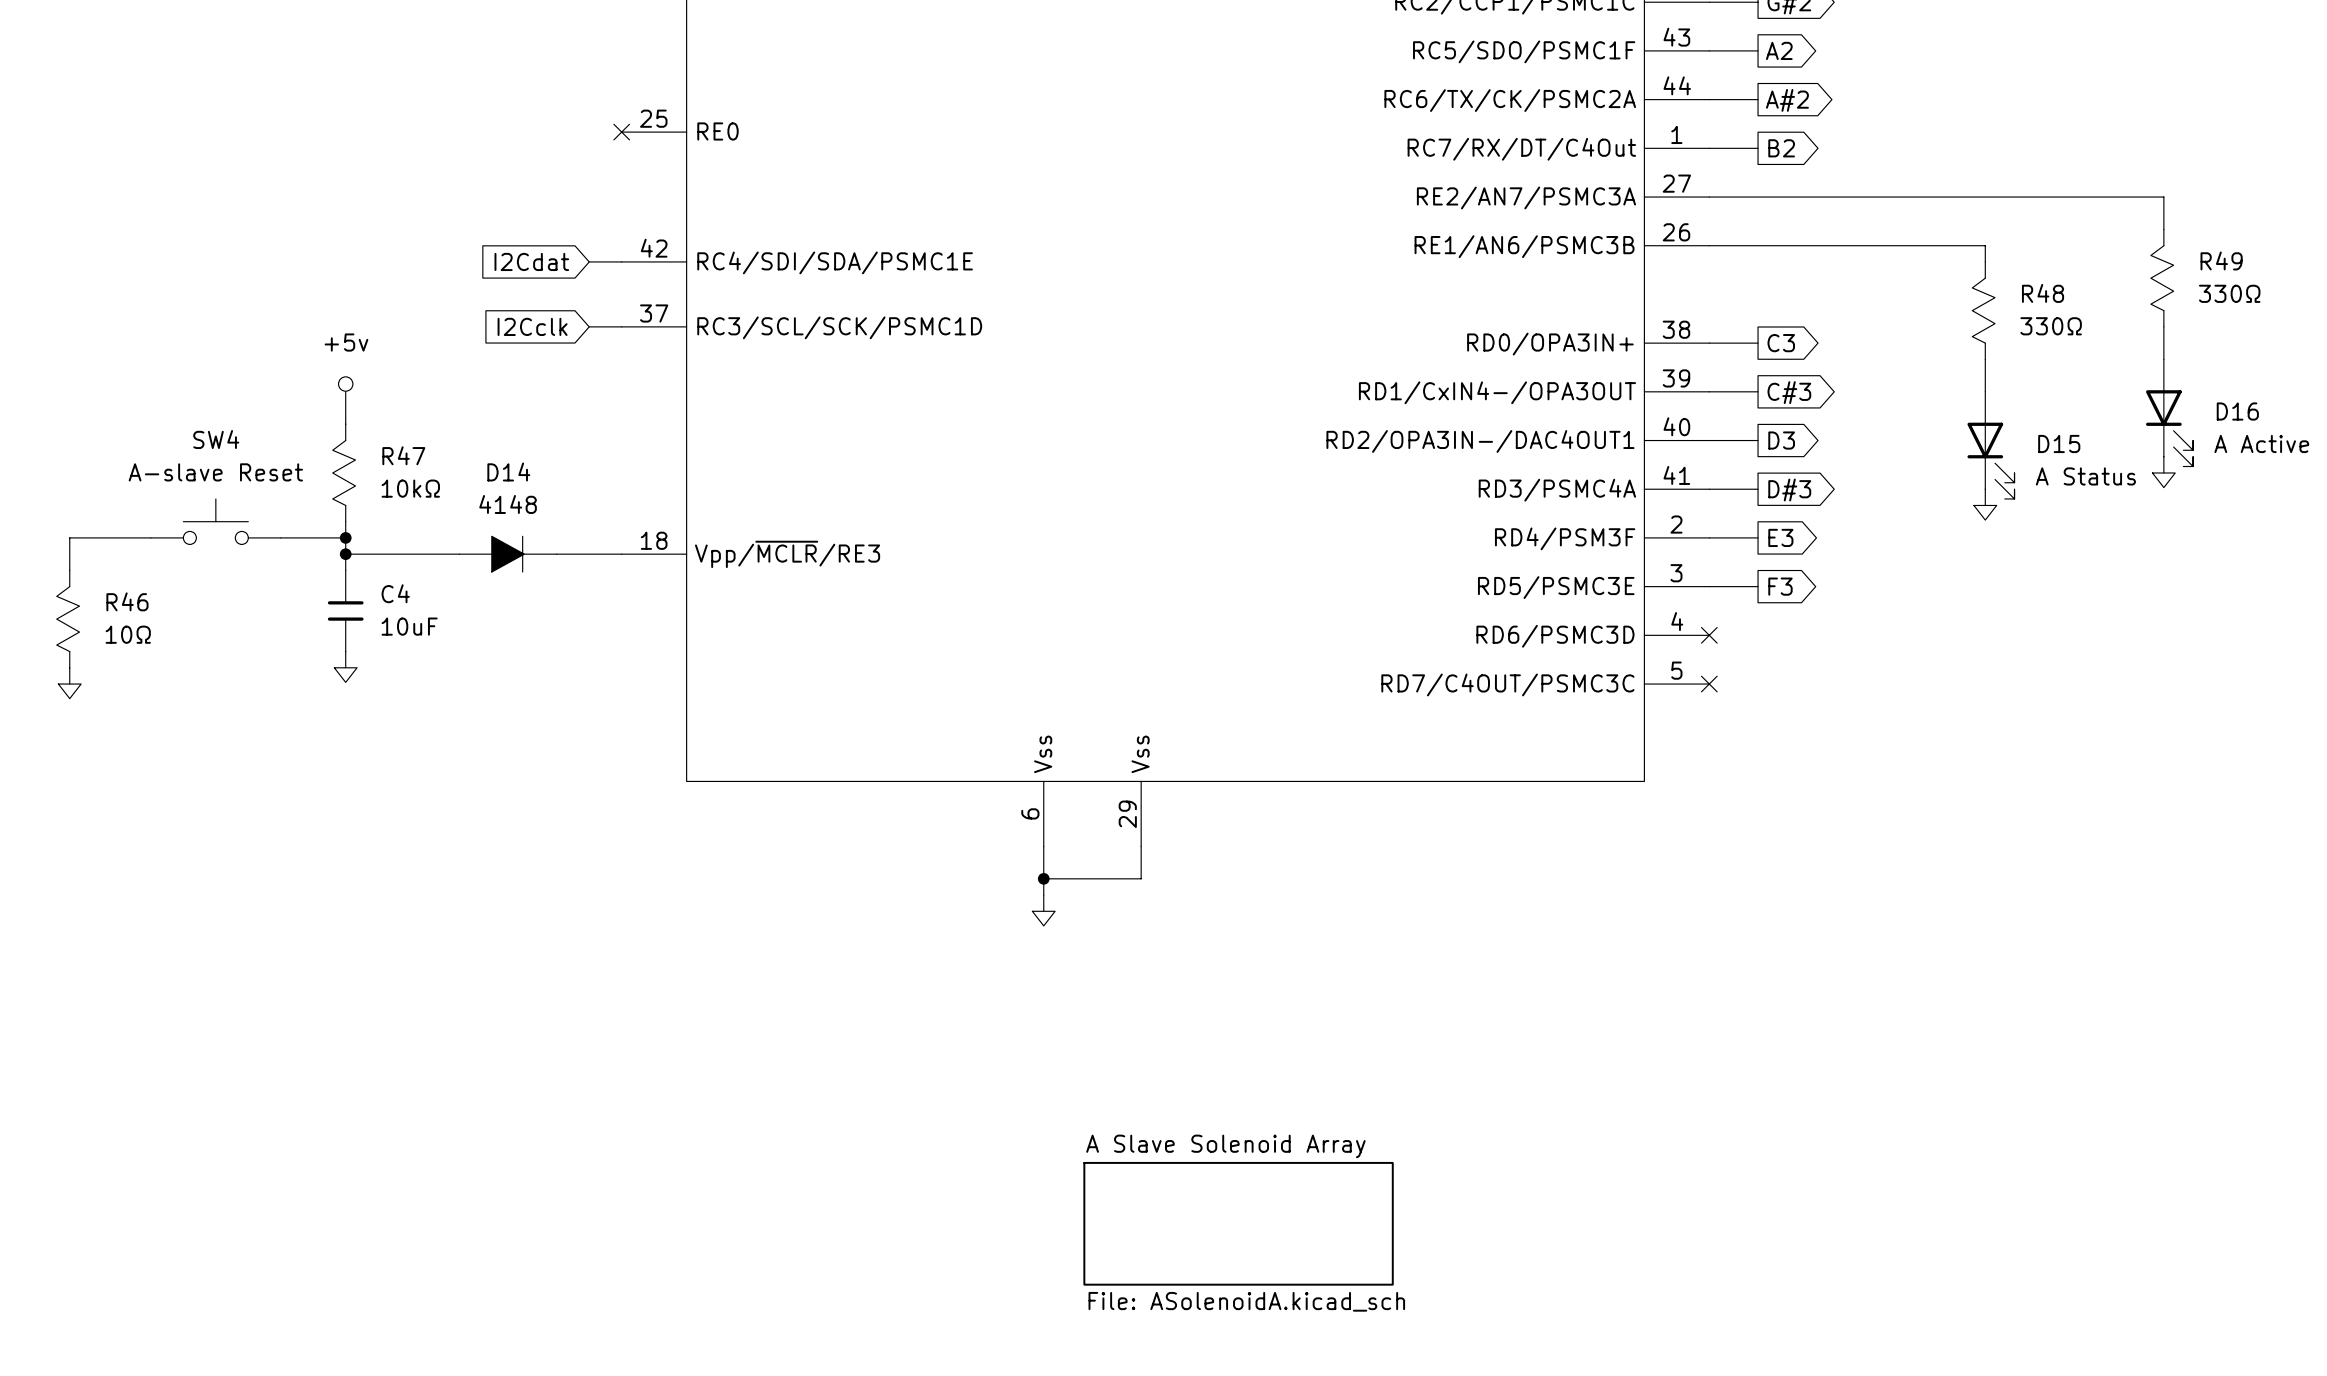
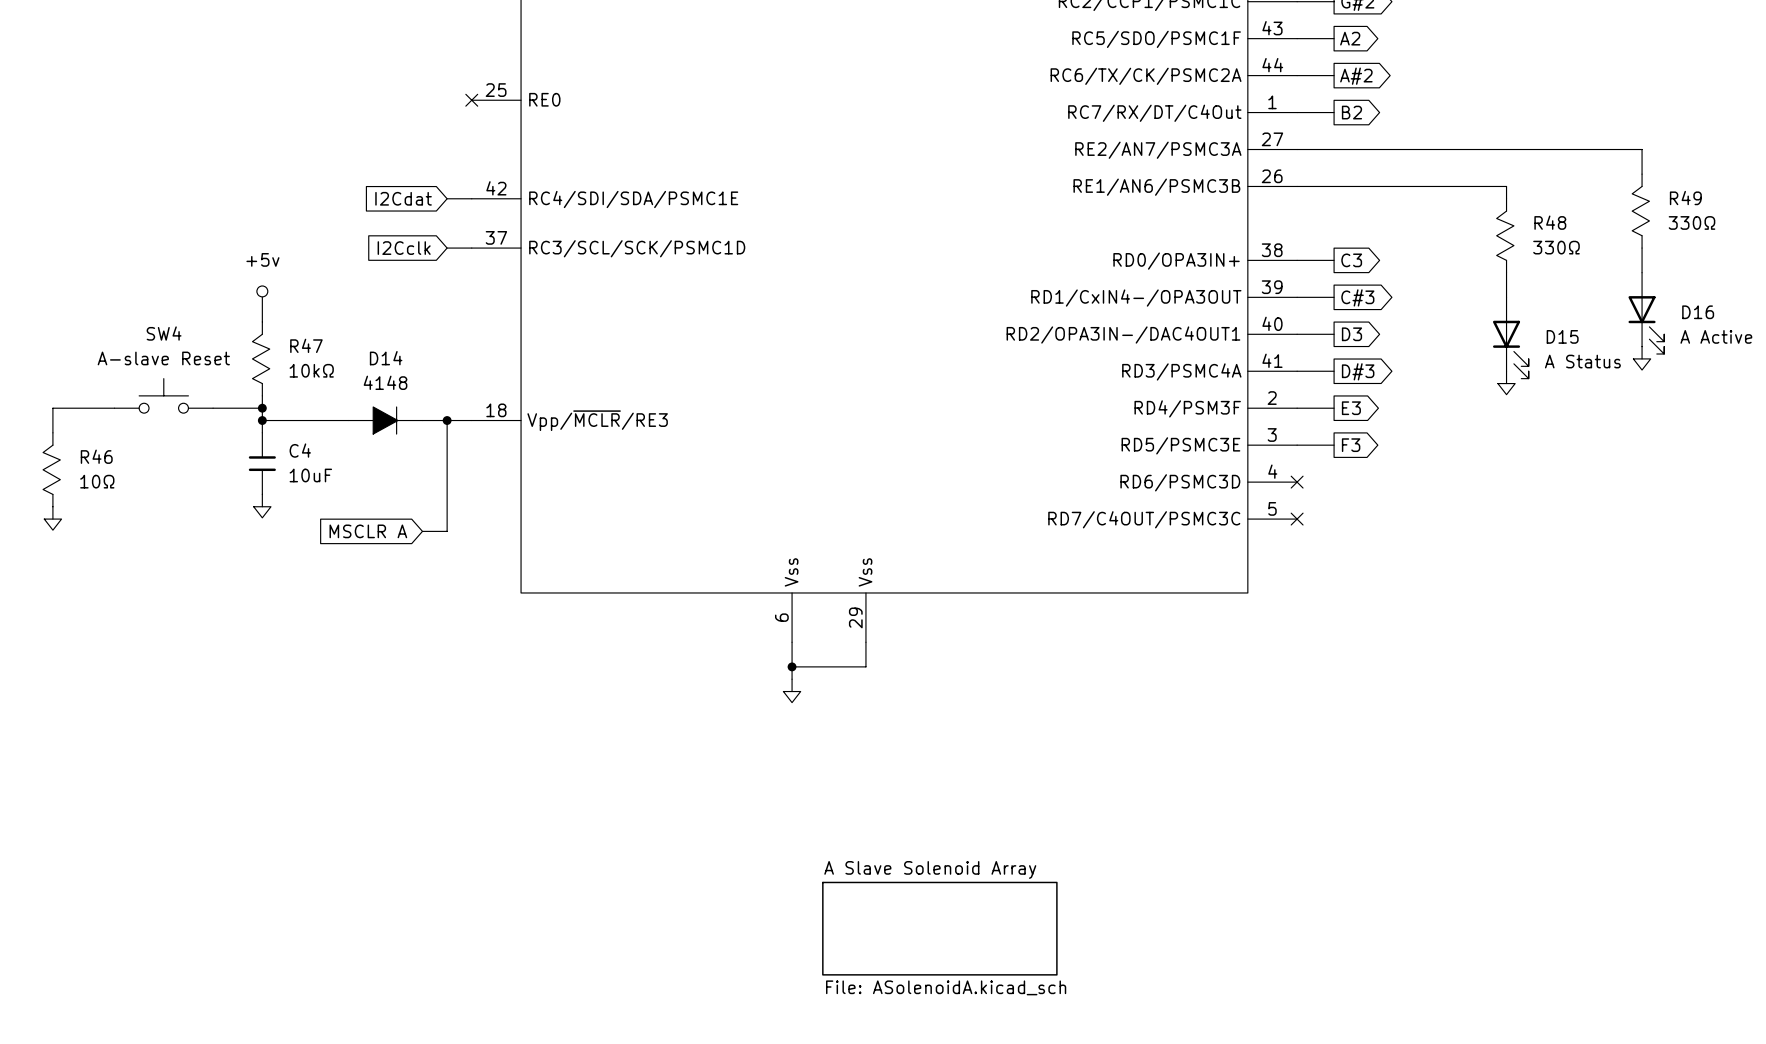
wire: none -> (447, 420) (447, 531) (422, 531)
junction: none -> (447, 420)
global label: none -> MSCLR A (368, 531)

